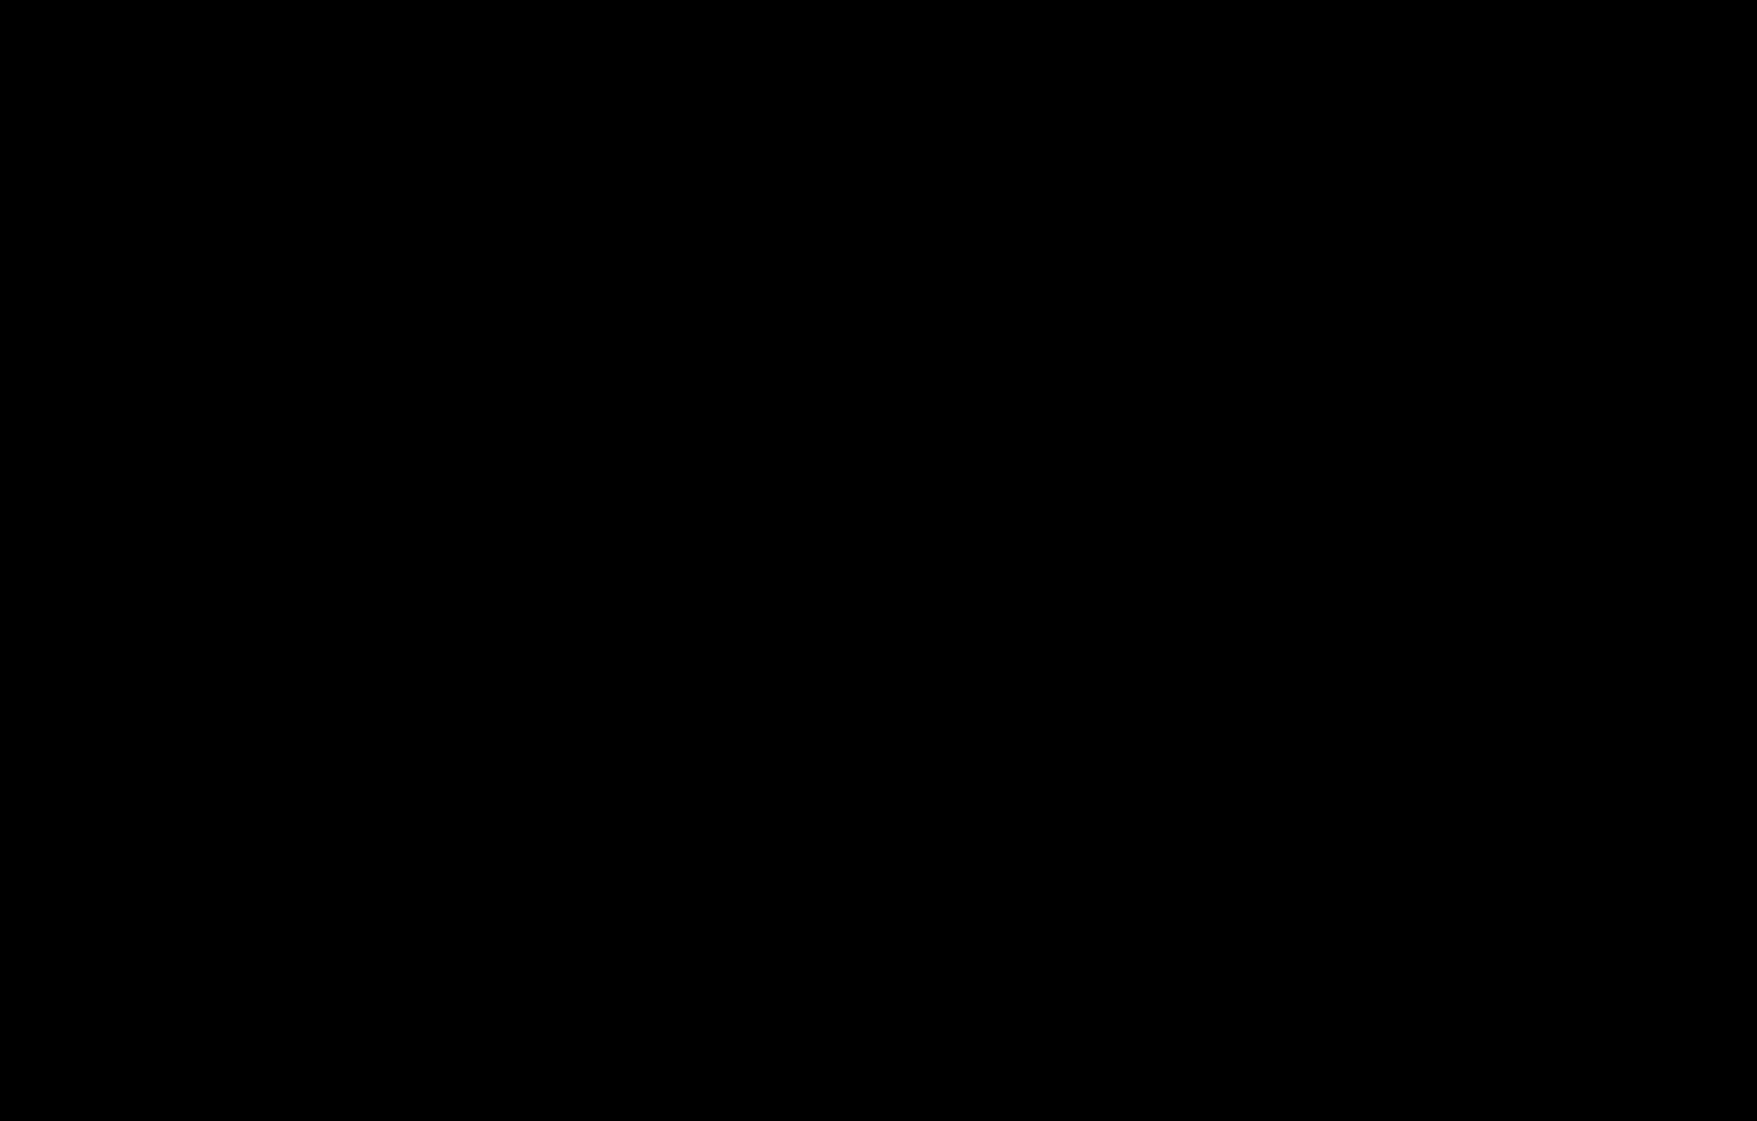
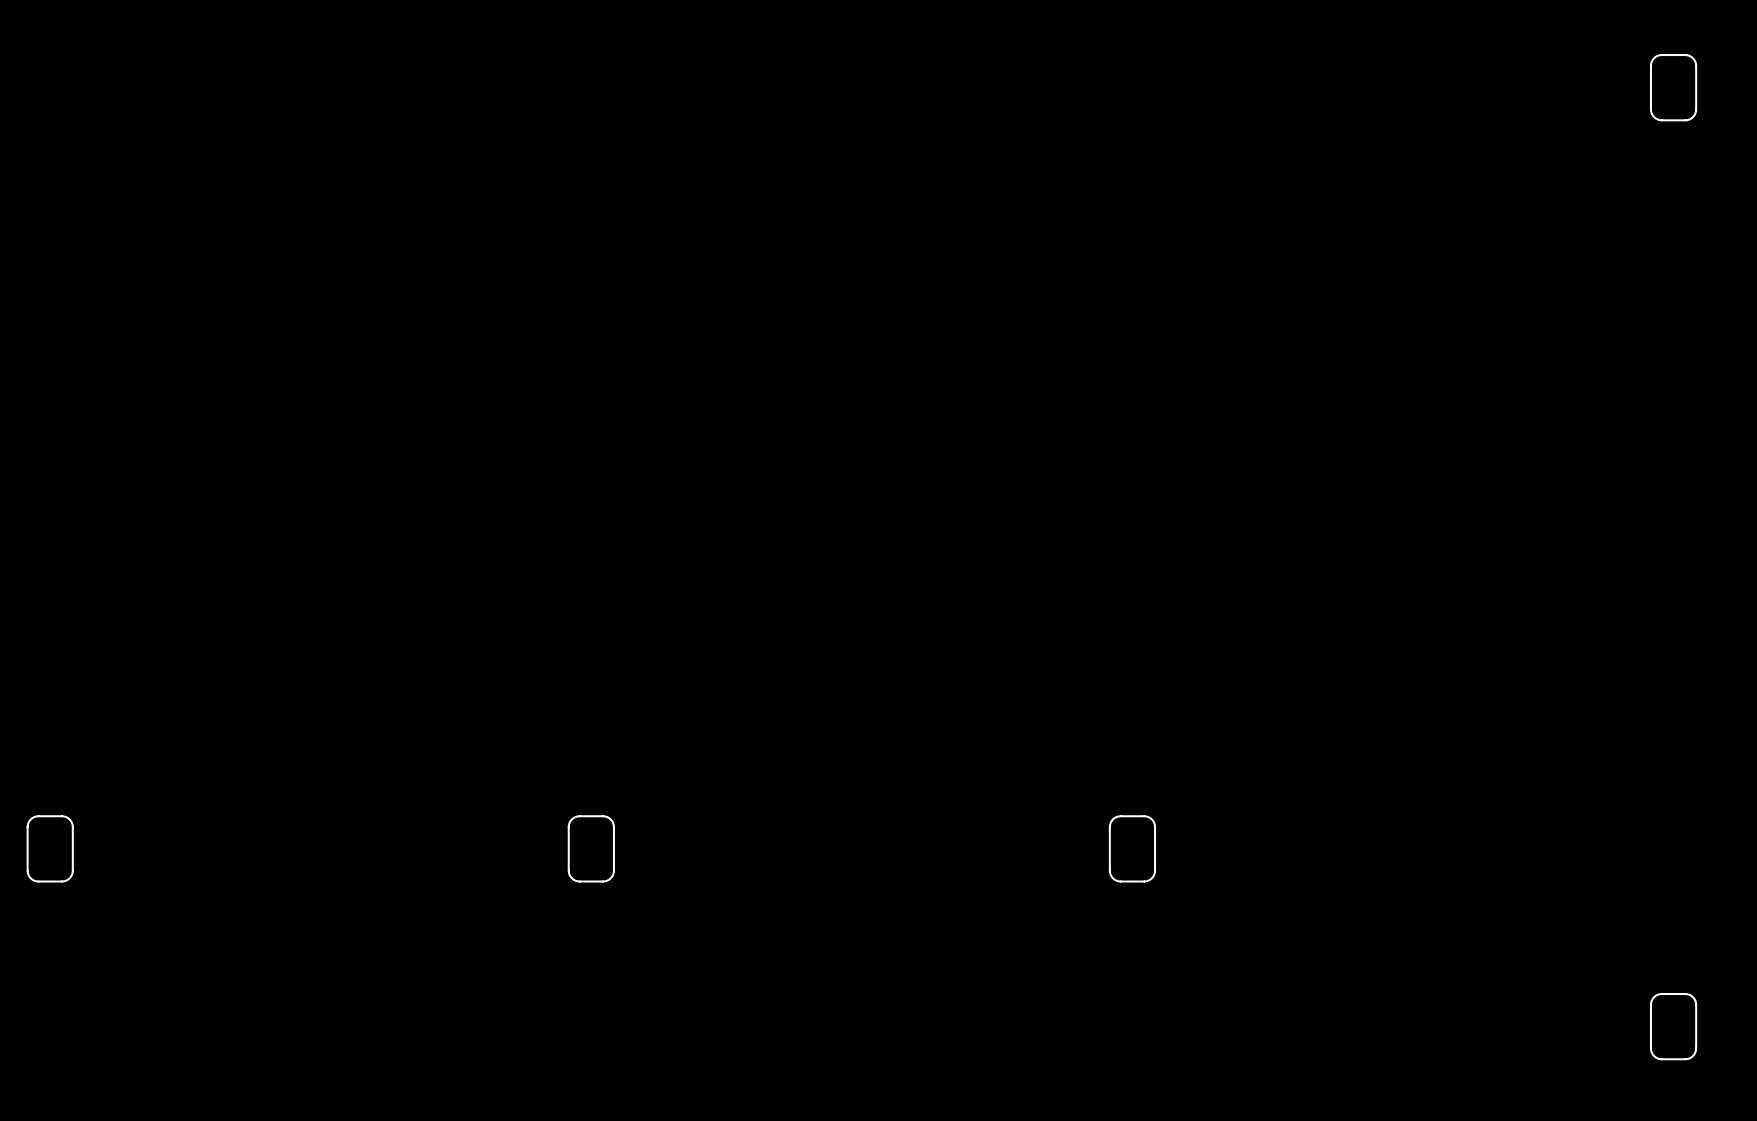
drawing: none -> [1649, 54, 1698, 122]
drawing: none -> [26, 815, 74, 883]
drawing: none -> [567, 815, 615, 883]
drawing: none -> [1108, 815, 1157, 883]
drawing: none -> [1649, 992, 1698, 1061]

